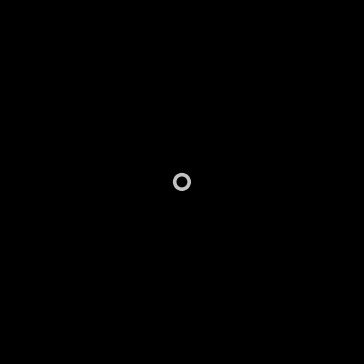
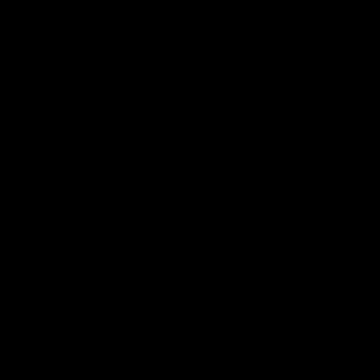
via: (181, 181) -> none

